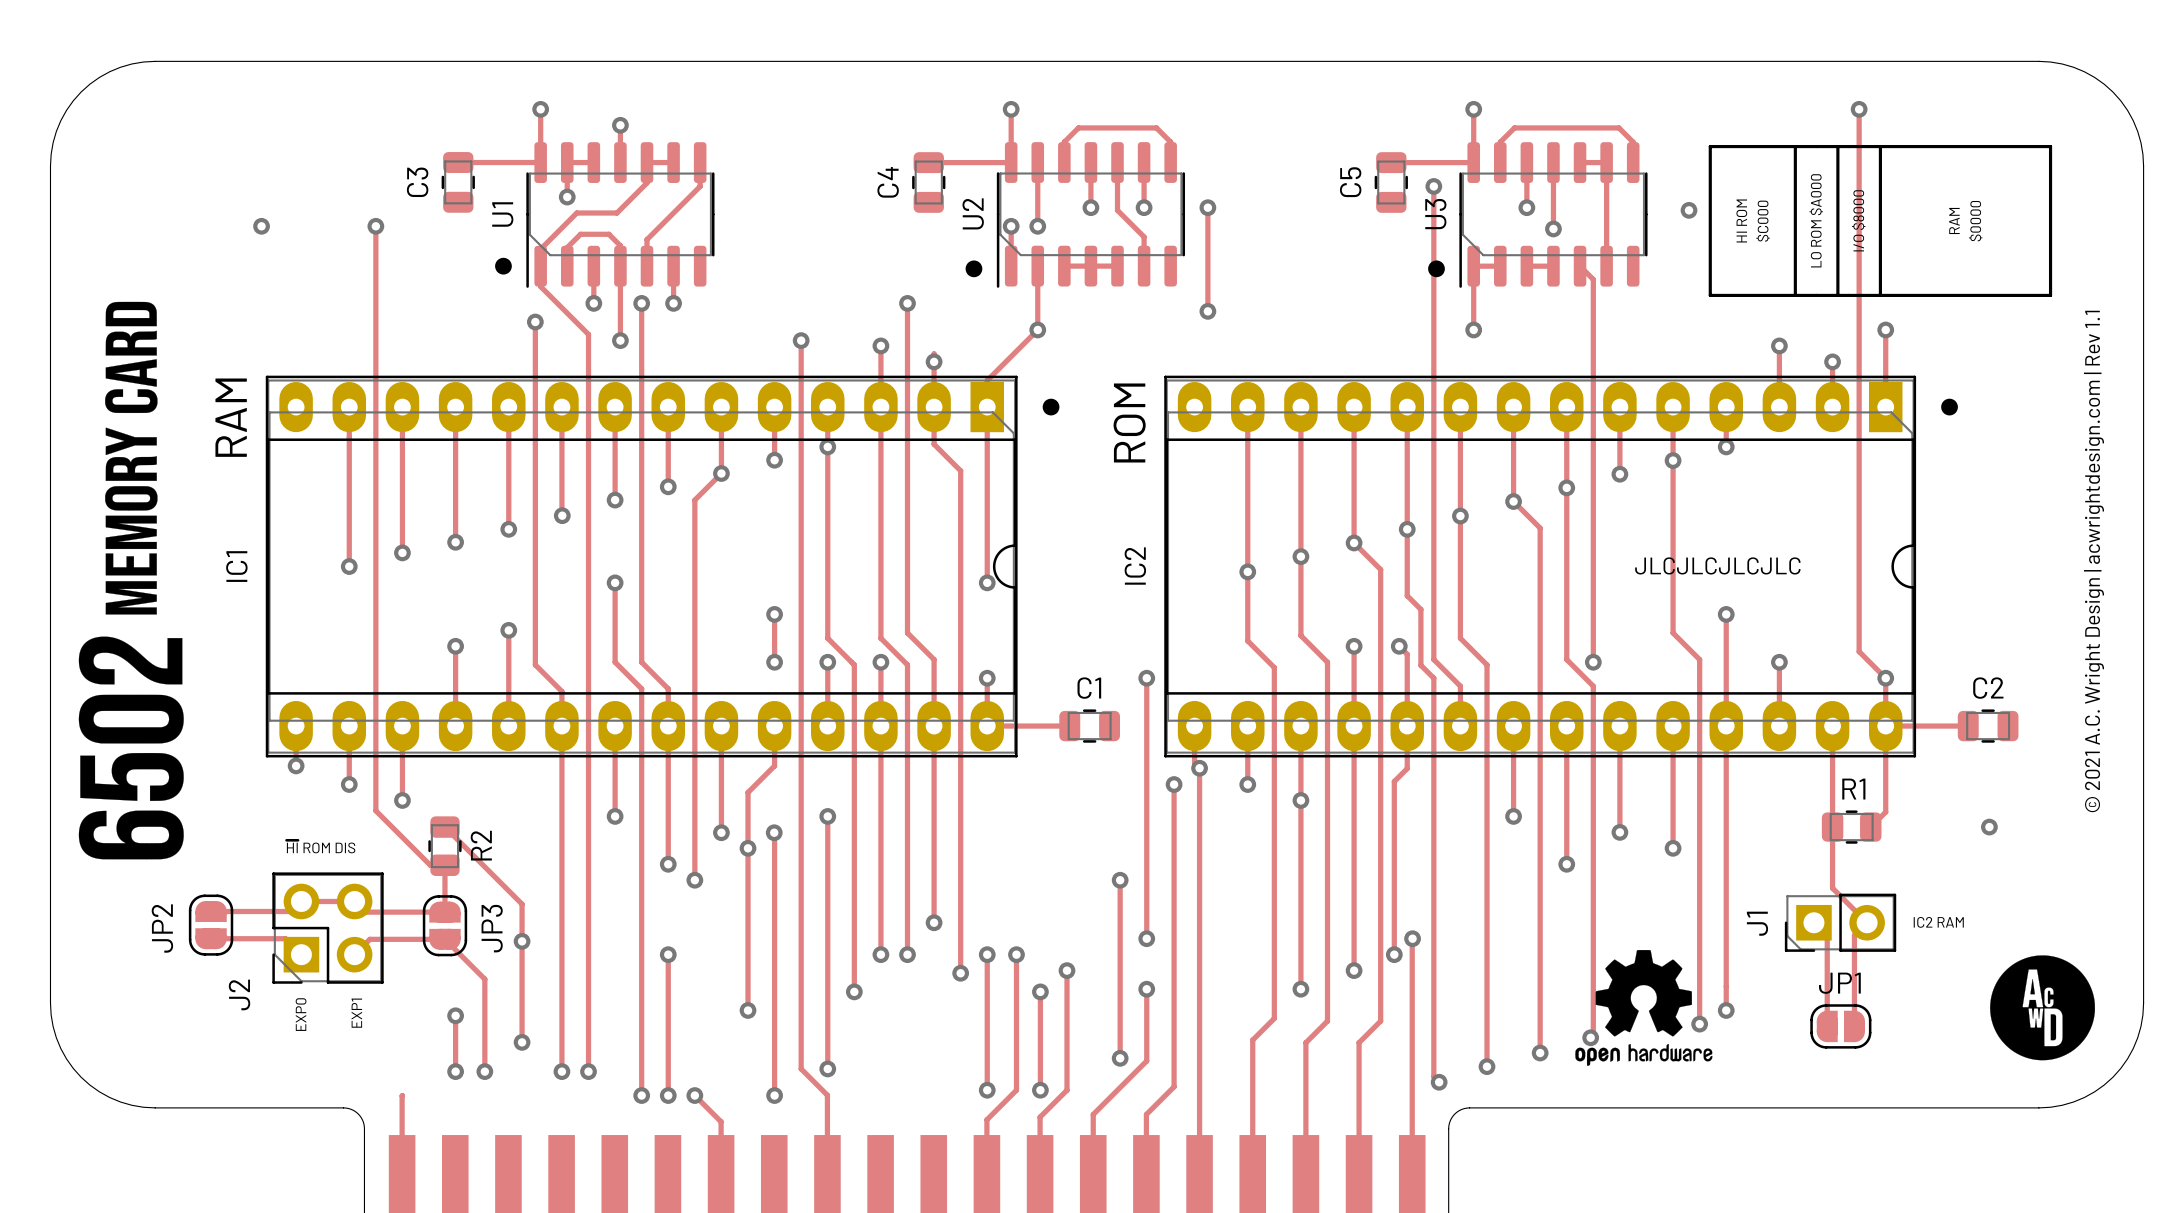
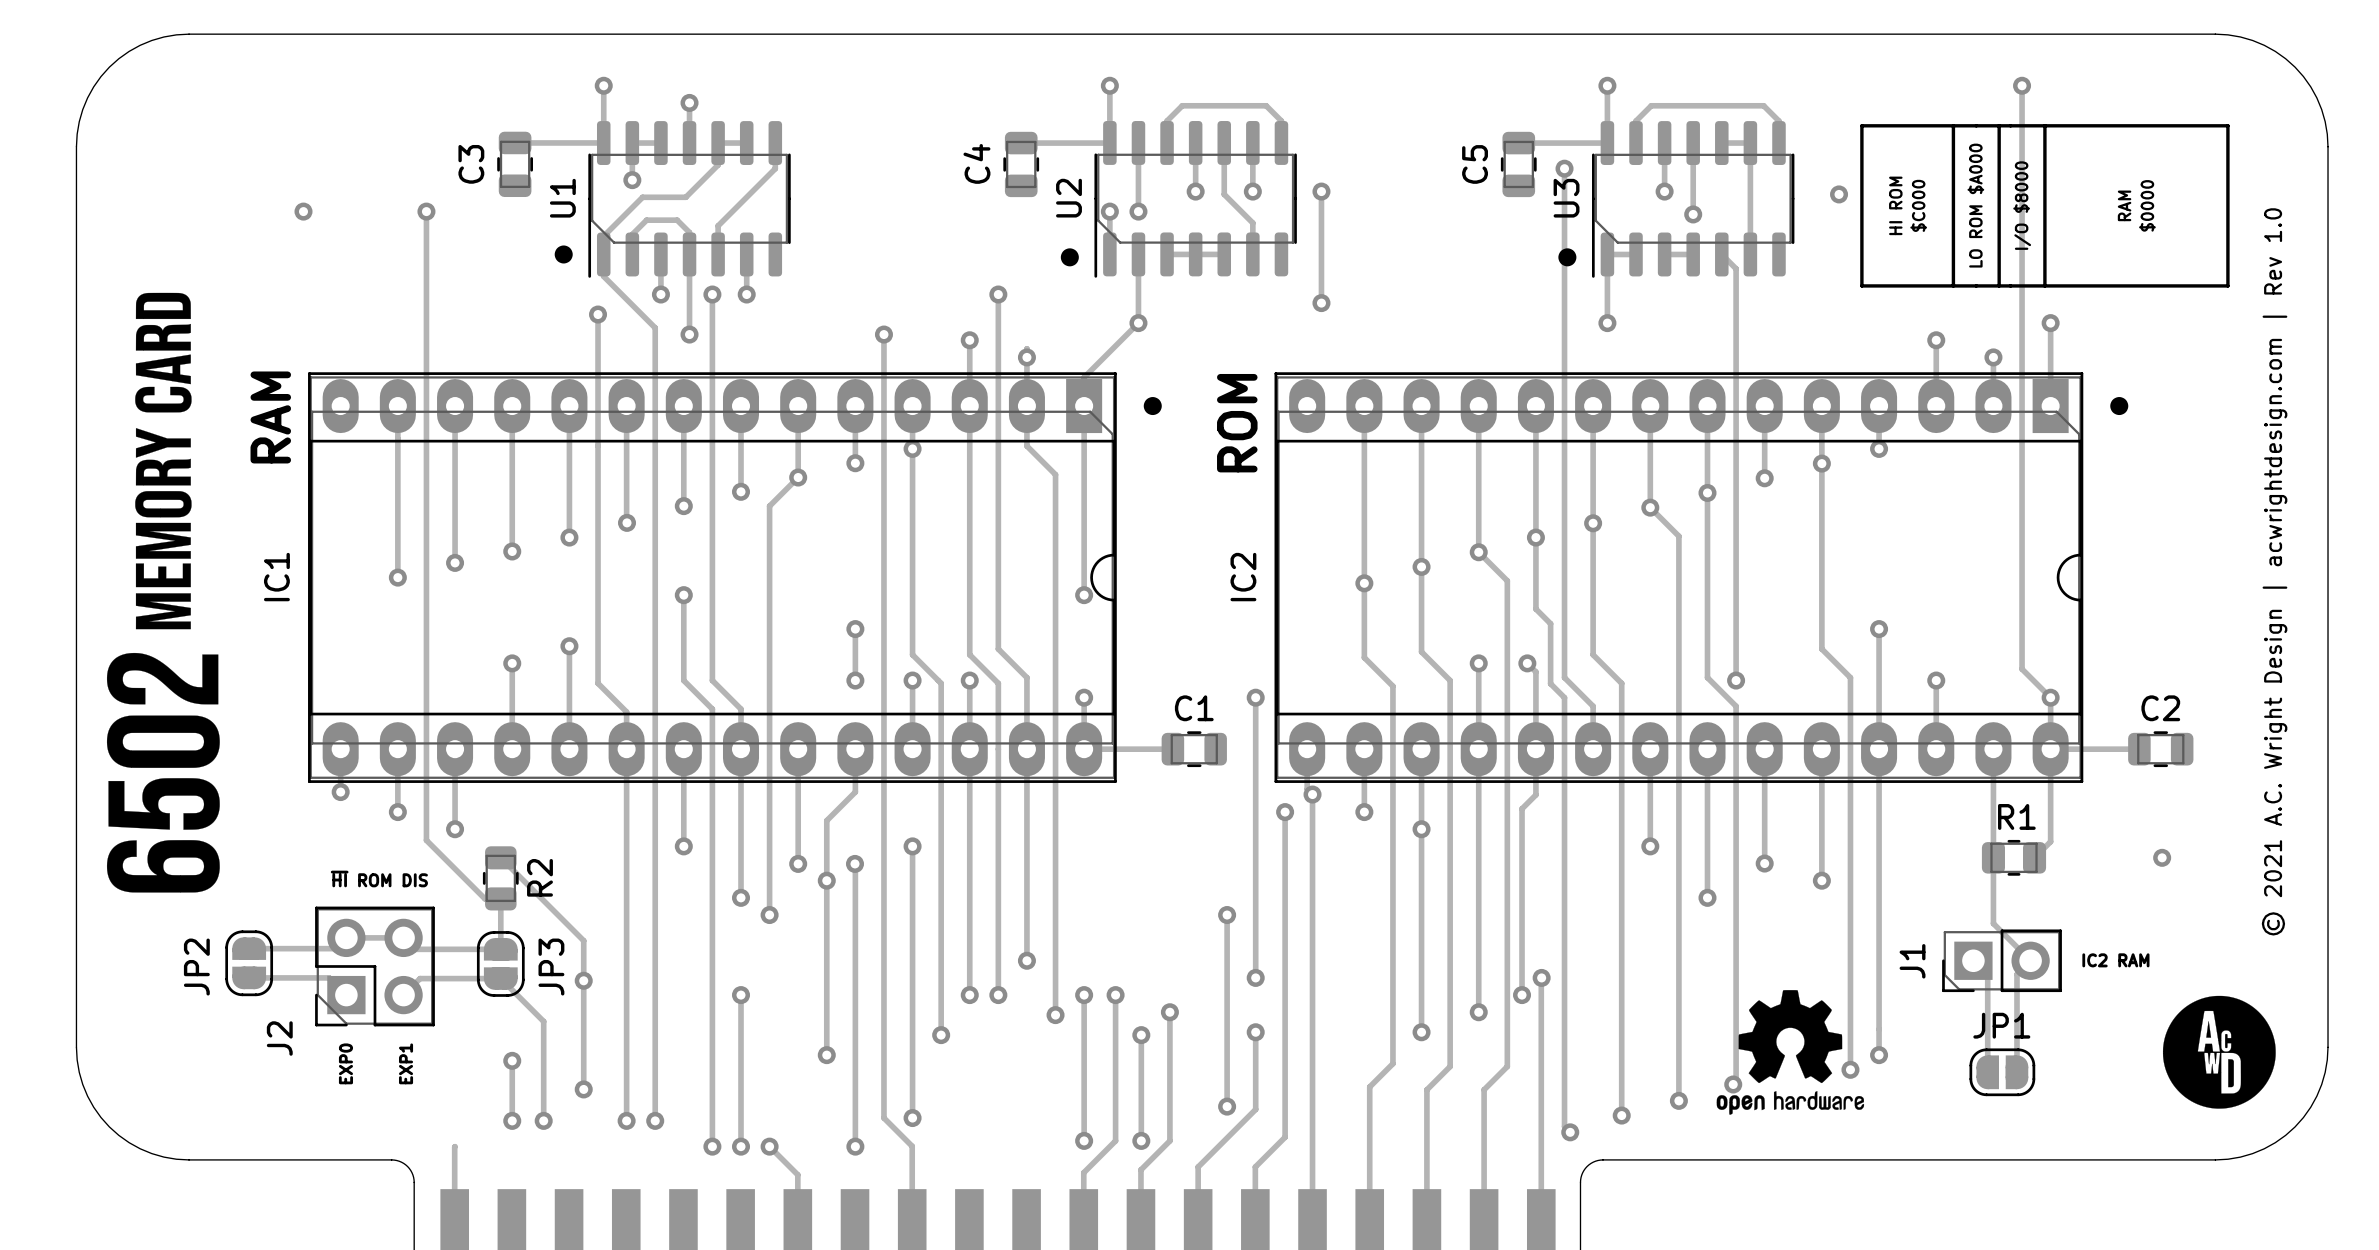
text: © 2021 A.C. Wright Design | acwrightdesign.com | Rev 1.1 (2093, 561) -> © 2021 A.C. Wright Design | acwrightdesign.com | Rev 1.0 (2274, 571)
text: JLCJLCJLCJLC (1717, 565) -> none

